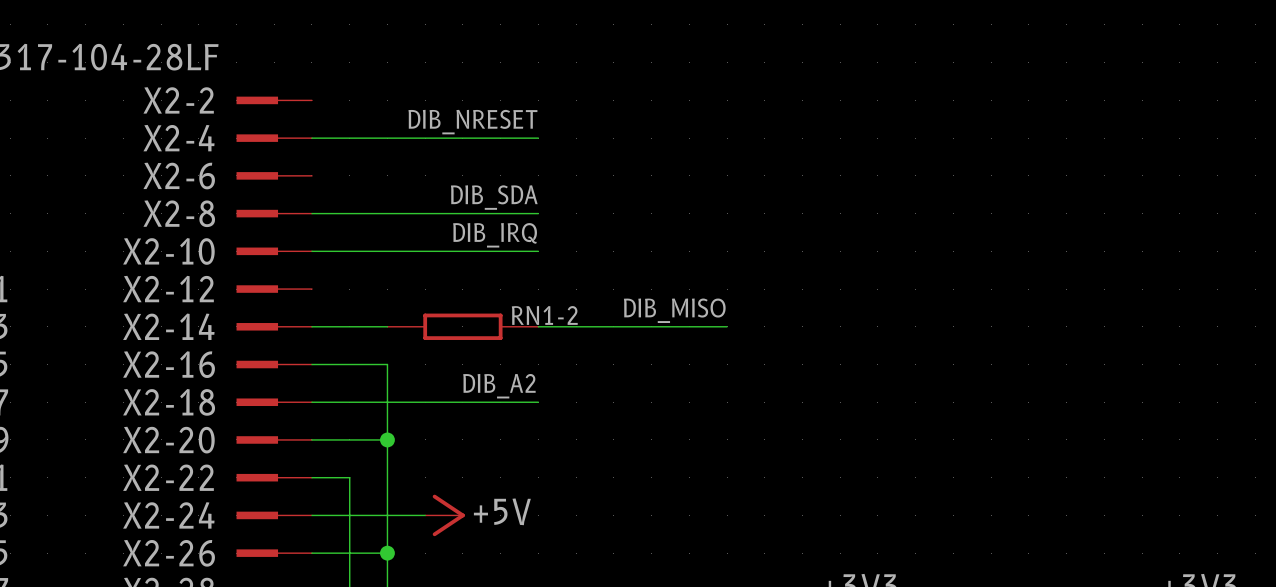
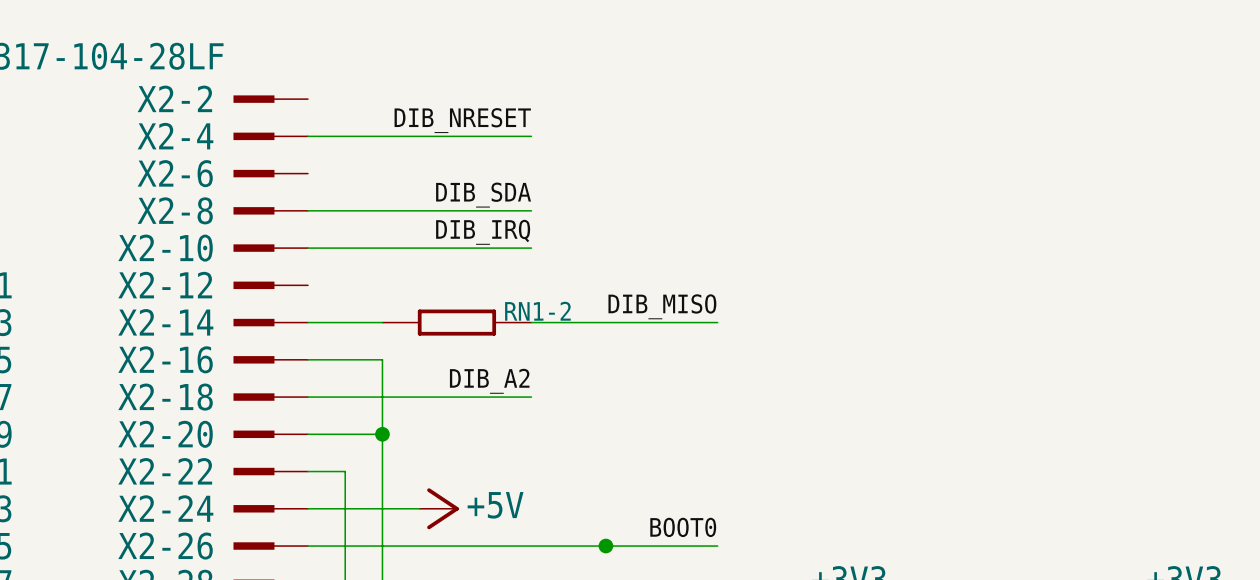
label: none -> BOOT0 (683, 527)
wire: none -> (382, 546) (717, 546)
junction: (387, 553) -> none
junction: none -> (605, 546)

